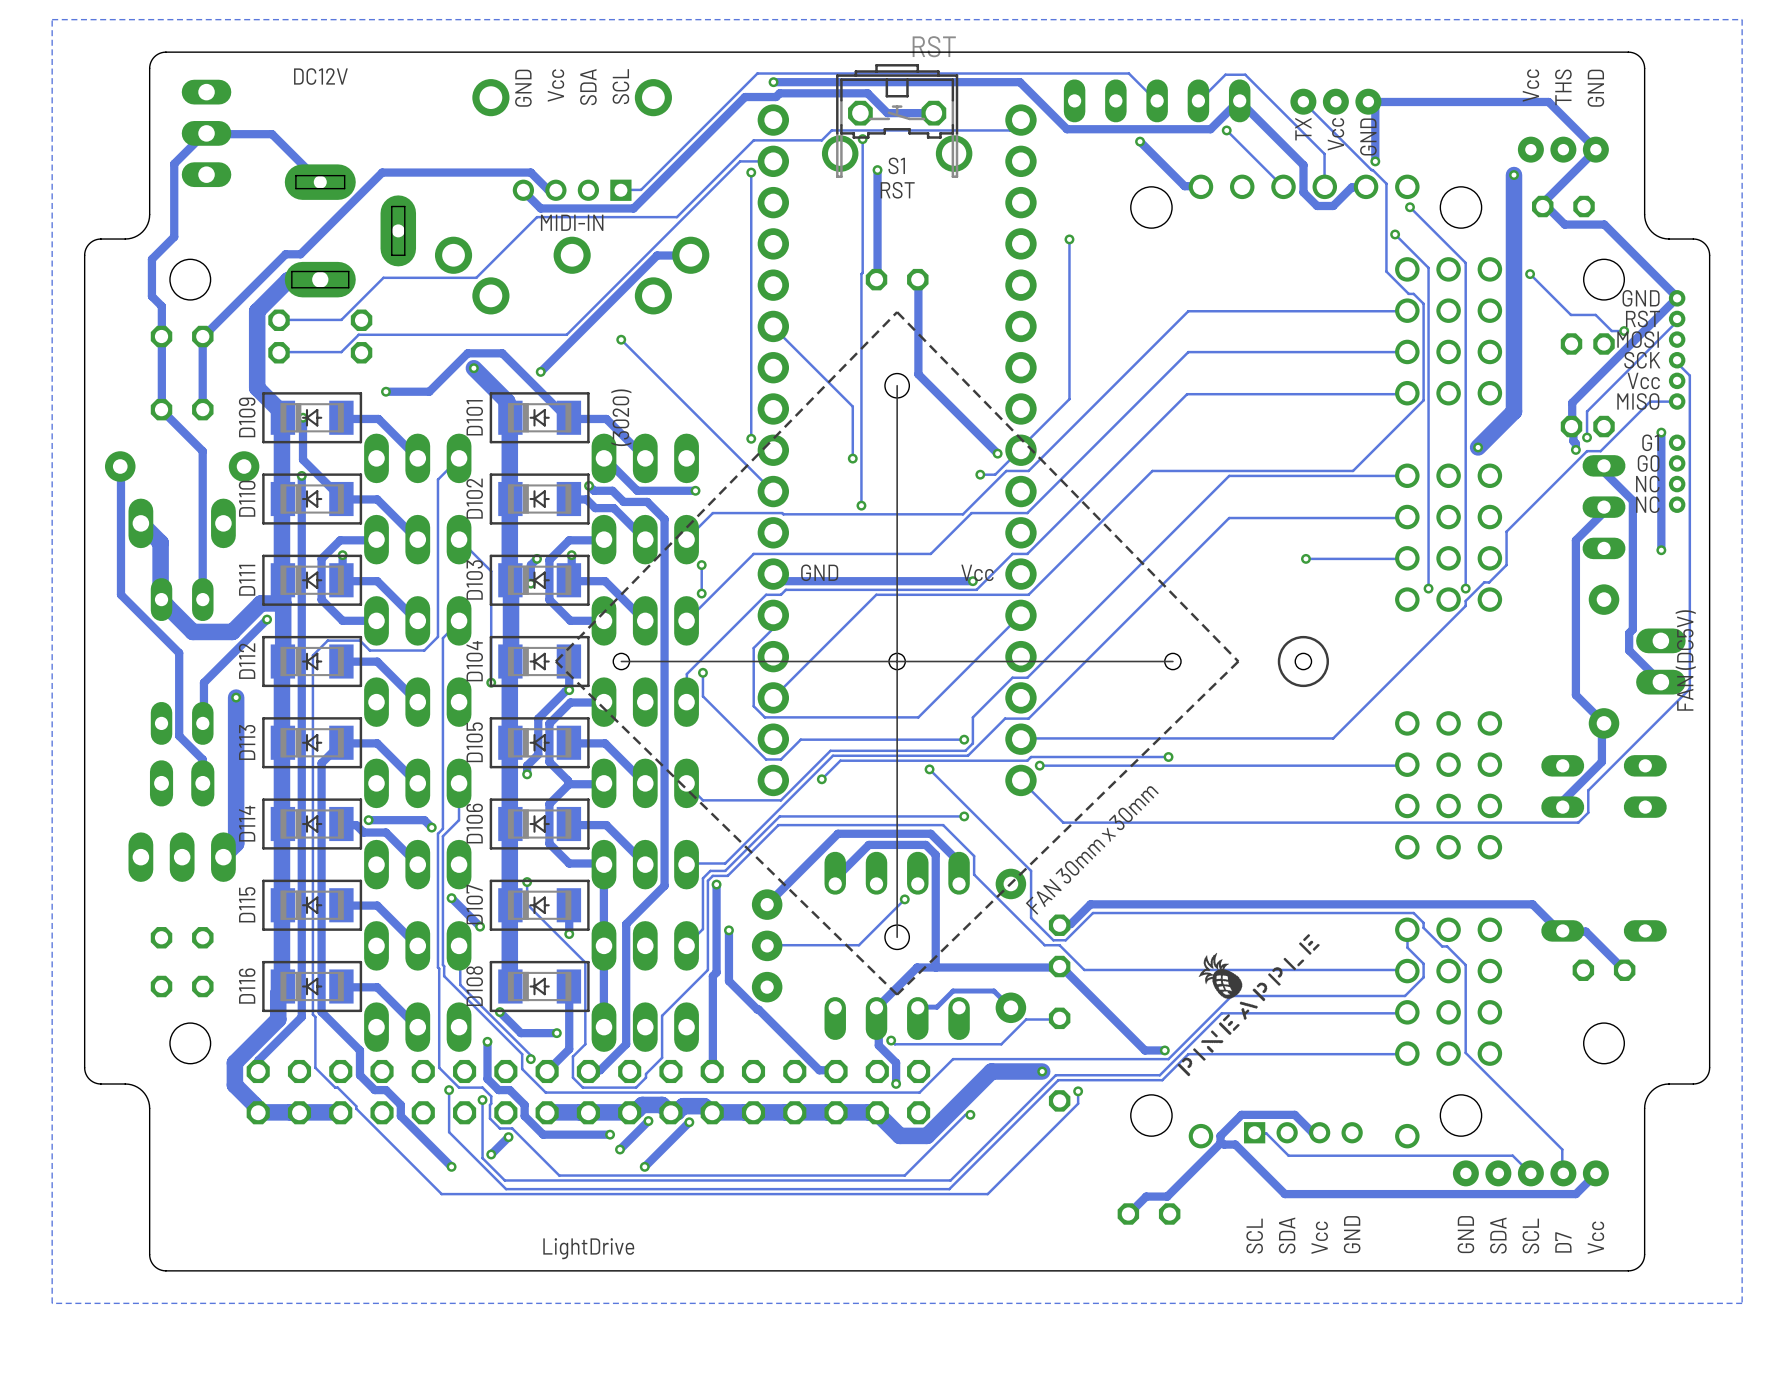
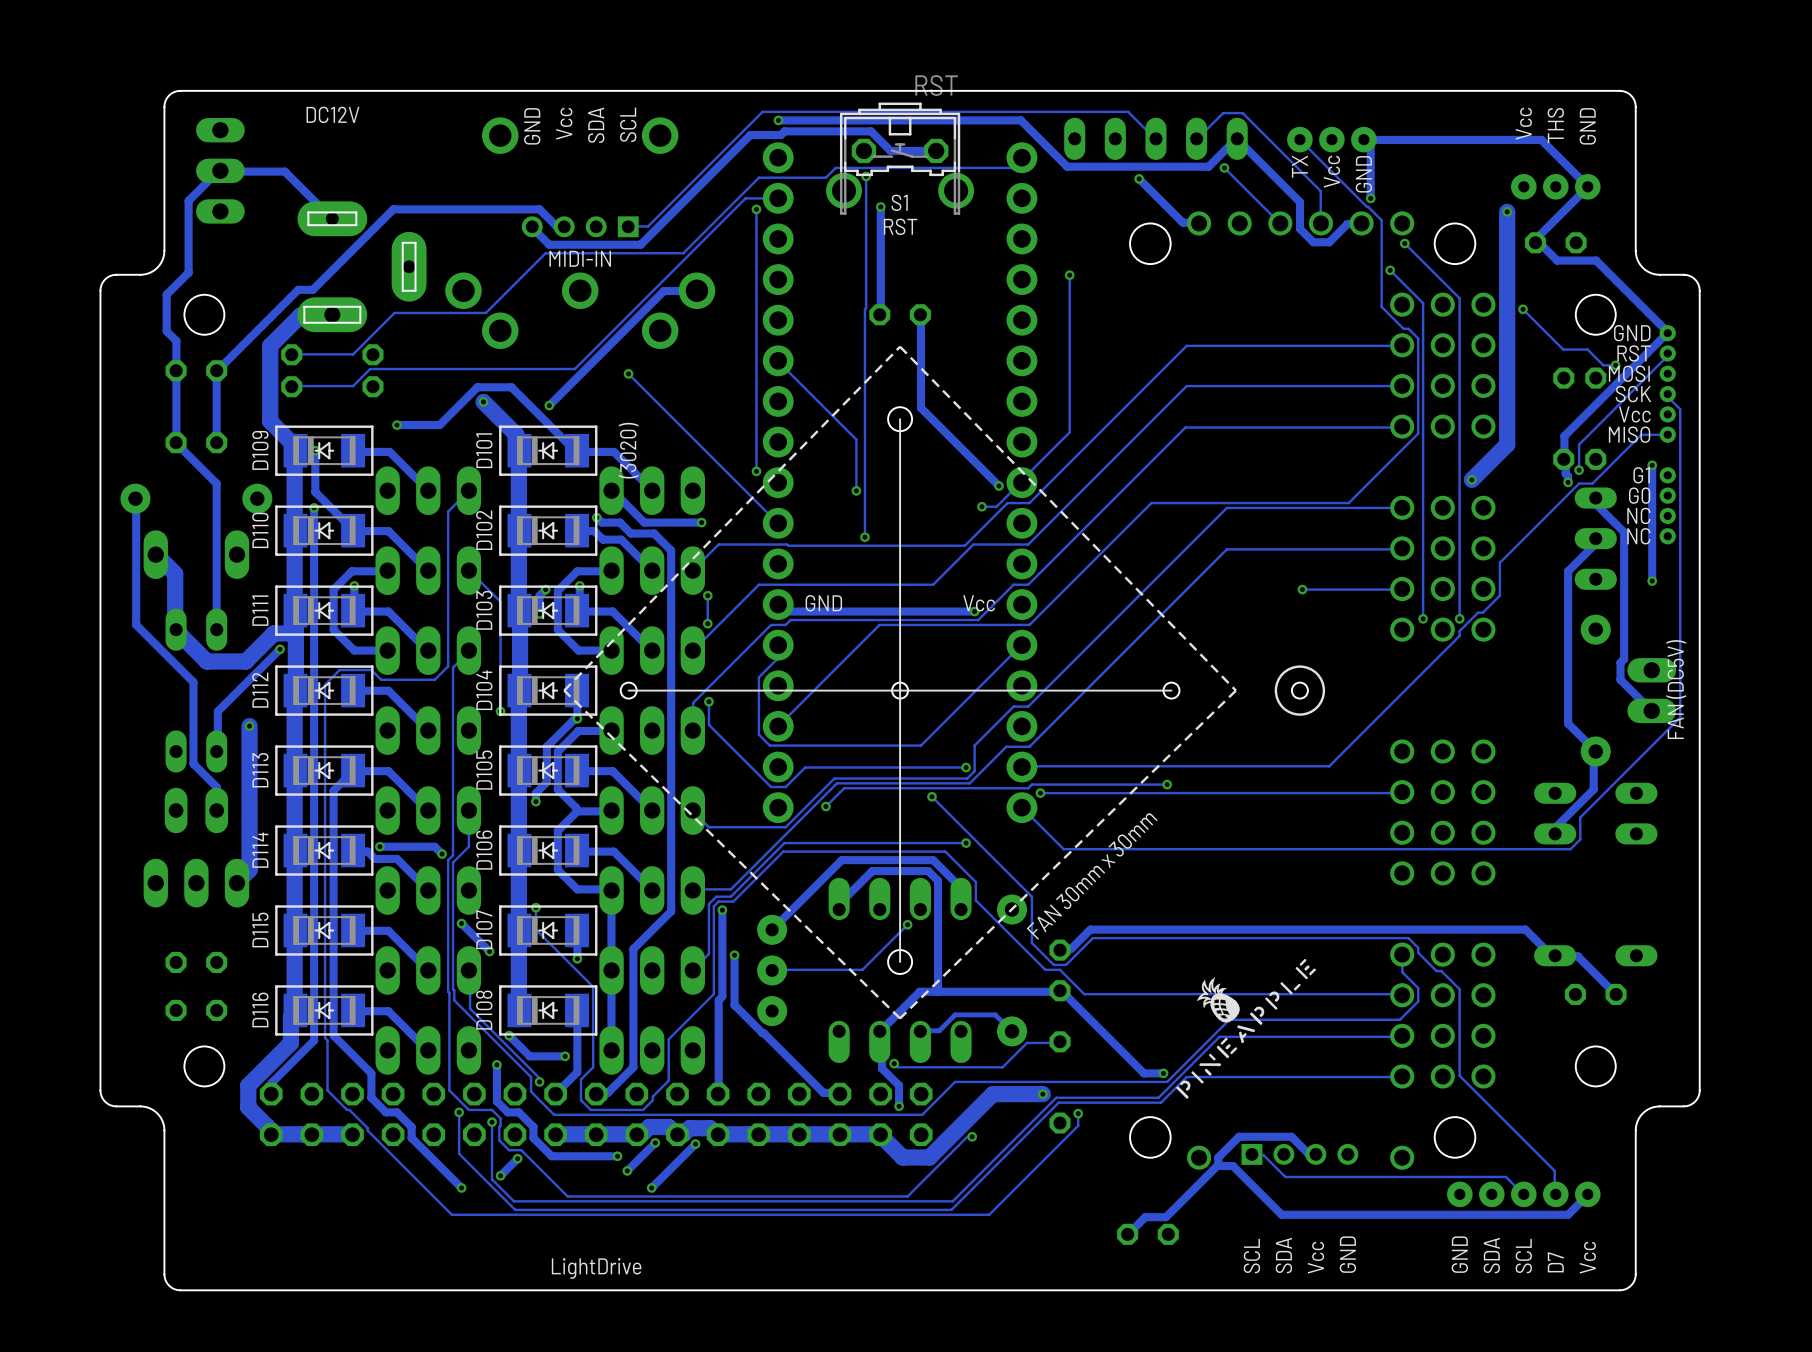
zone outline: (1742, 19) (52, 19) (52, 1303) (1742, 1303) (1742, 19) -> none

